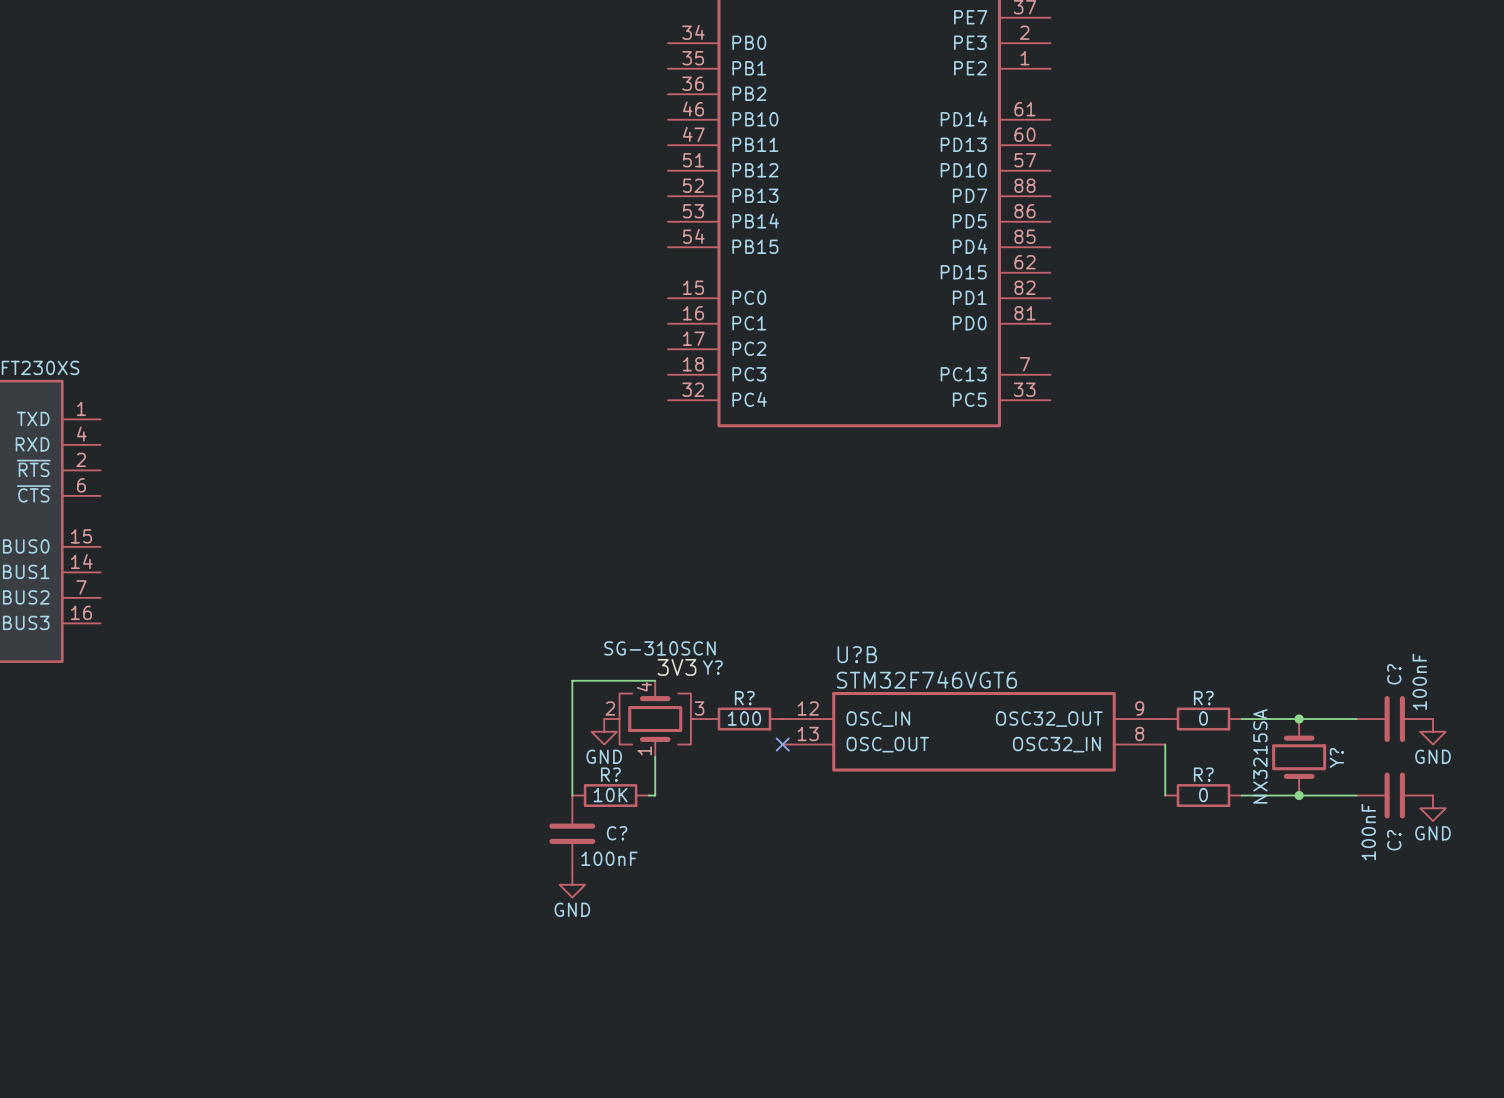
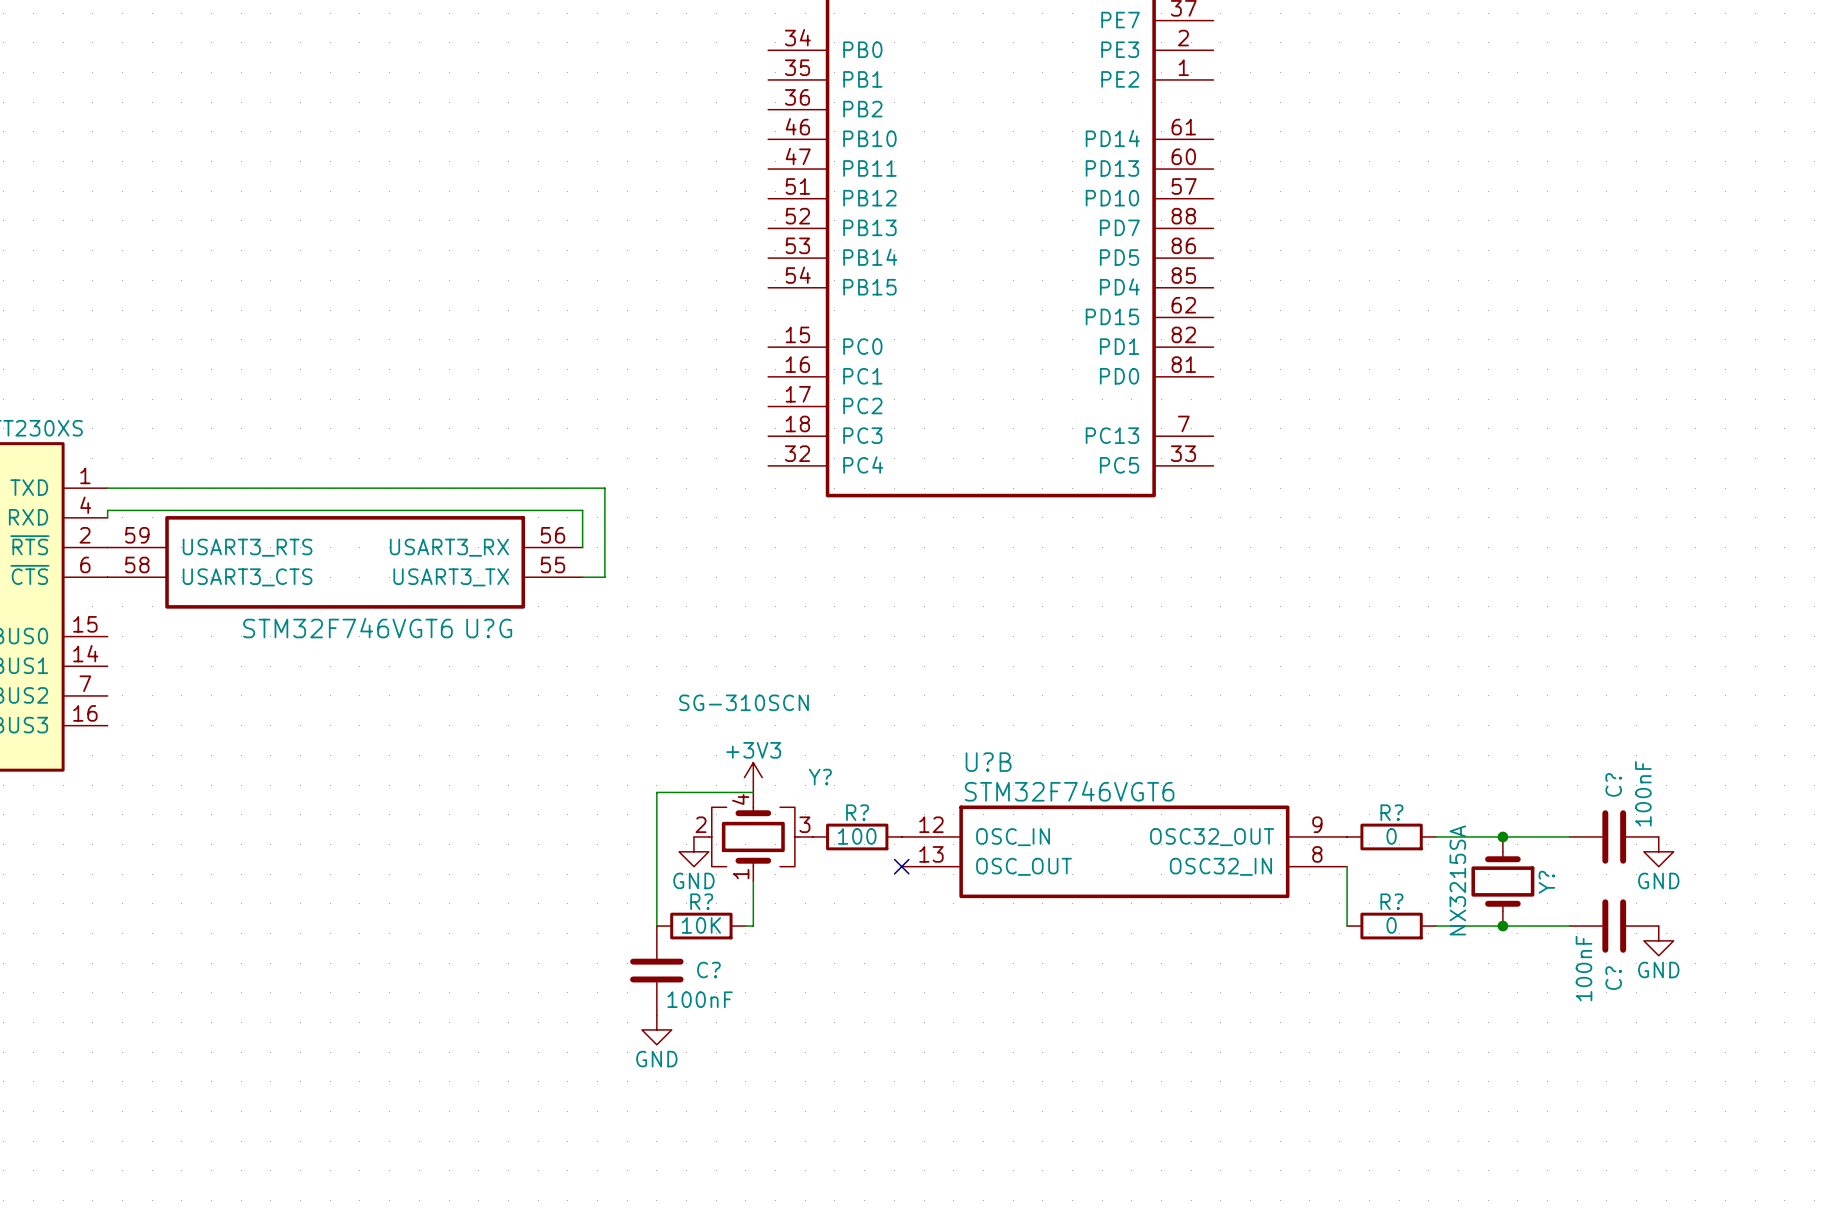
wire: none -> (107, 488) (604, 488) (604, 577) (582, 577)
wire: none -> (107, 517) (107, 510) (582, 510) (582, 547)
U?G: none -> STM32F746VGT6 (345, 562)
Y? value position: SG-310SCN (659, 648) -> SG-310SCN (744, 702)
label: 3V3 (677, 667) -> none
power symbol: none -> +3V3 (753, 777)

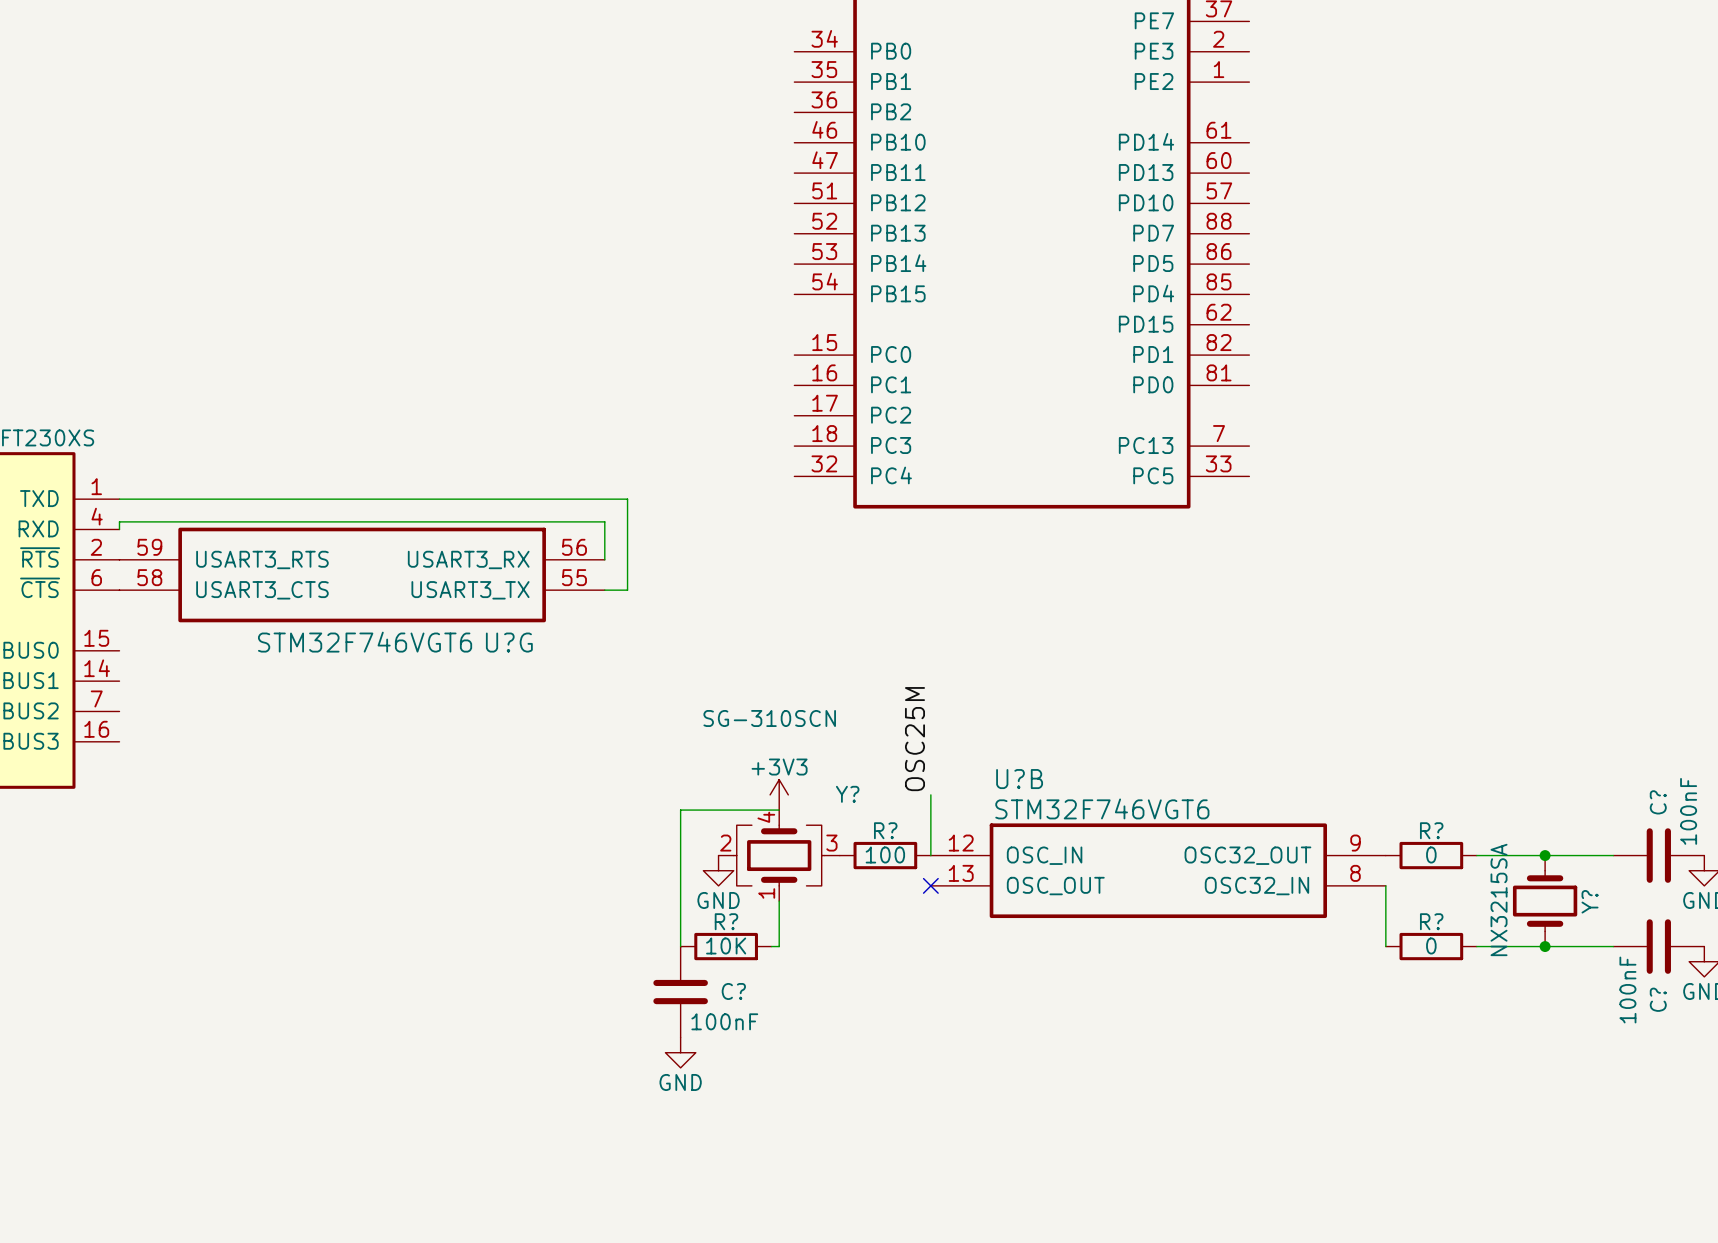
label: none -> OSC25M (914, 739)
wire: none -> (930, 794) (930, 855)

